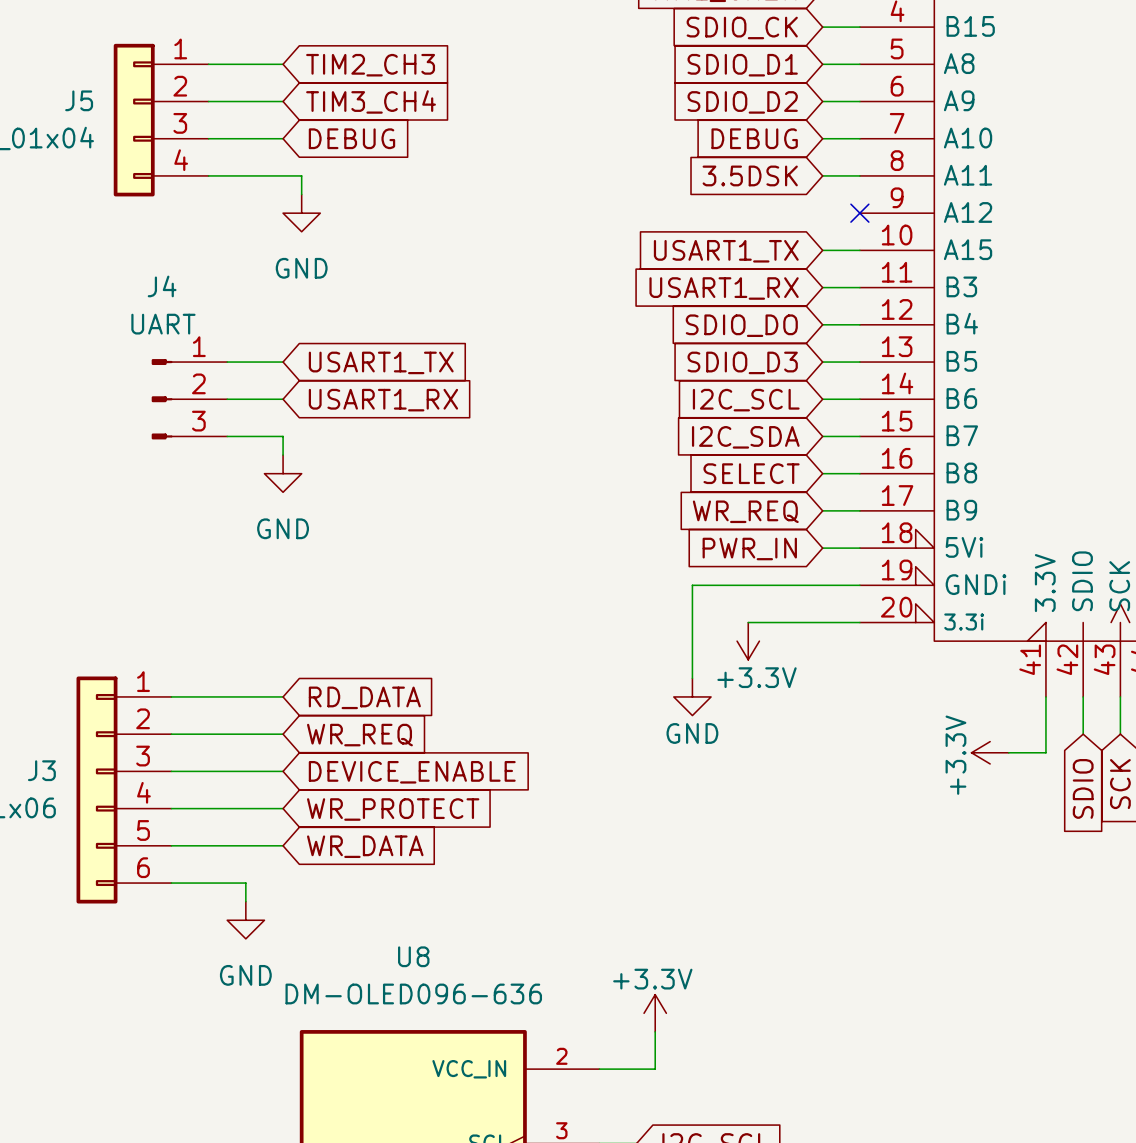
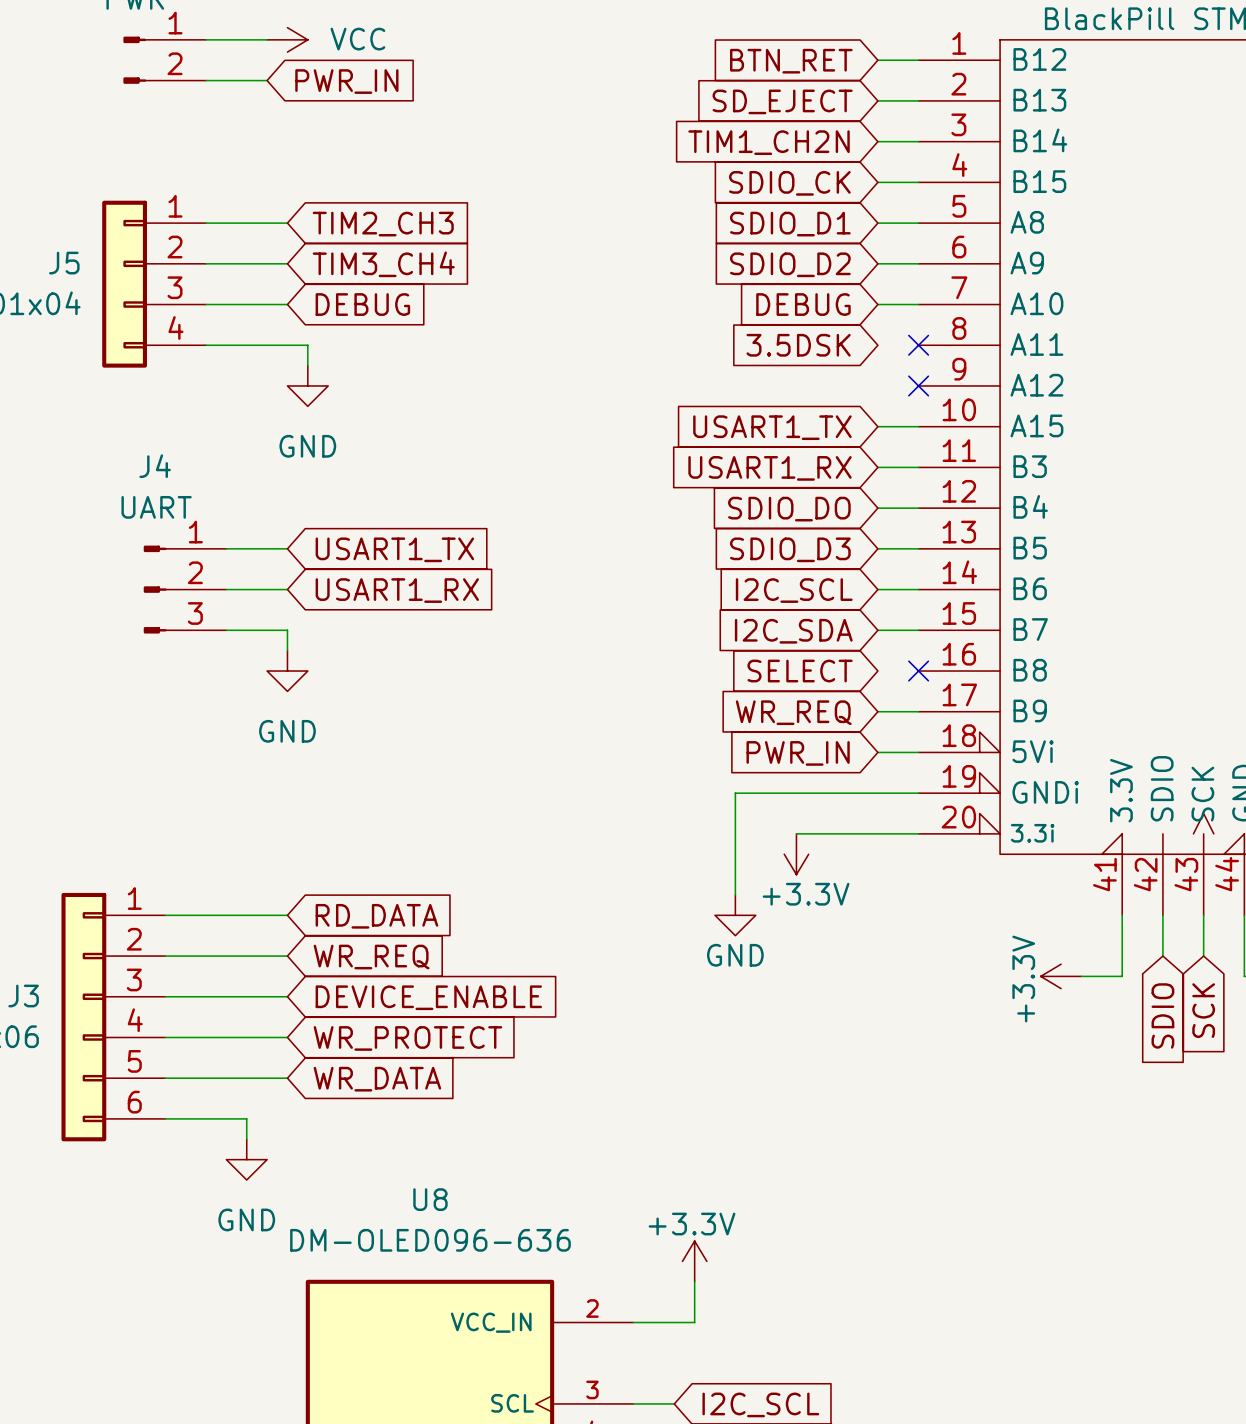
wire: (822, 175) (859, 175) -> none
no-connect mark: none -> (918, 345)
wire: (822, 473) (859, 473) -> none
no-connect mark: none -> (918, 671)

